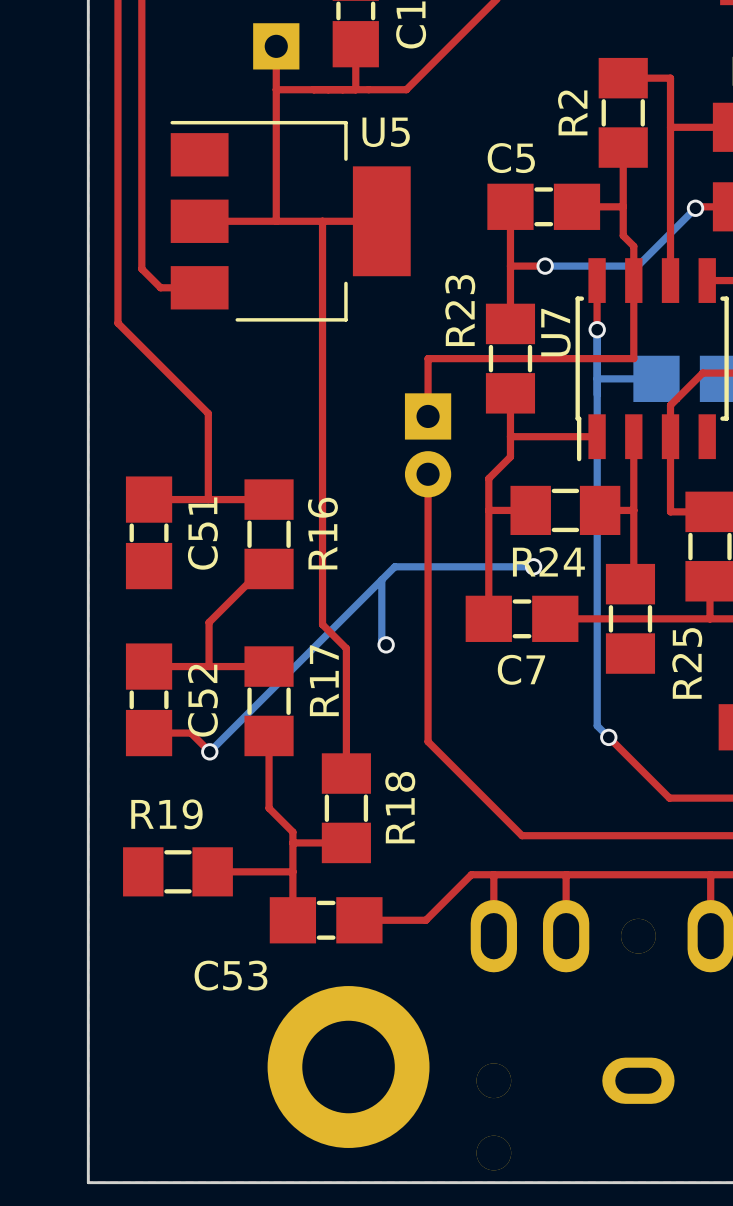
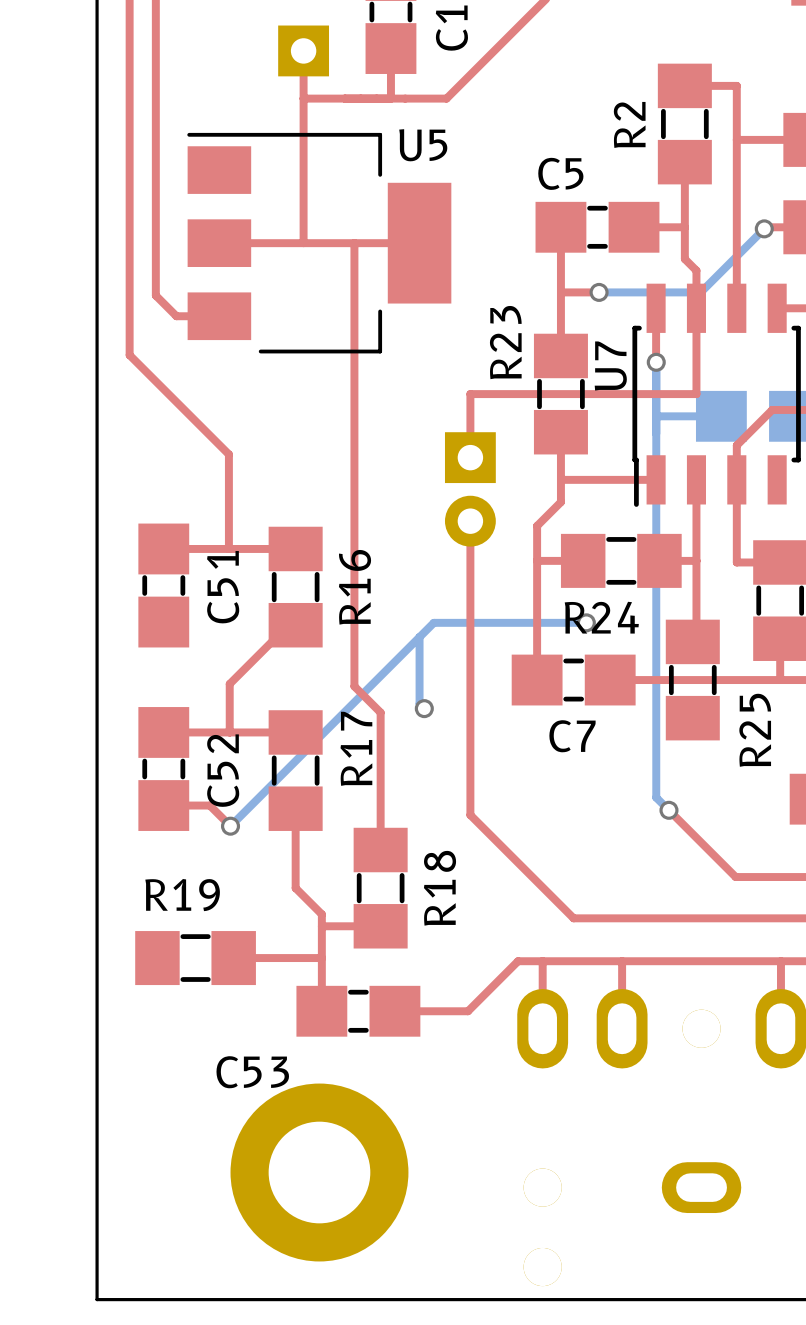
part position: (348, 1067) -> (319, 1172)

